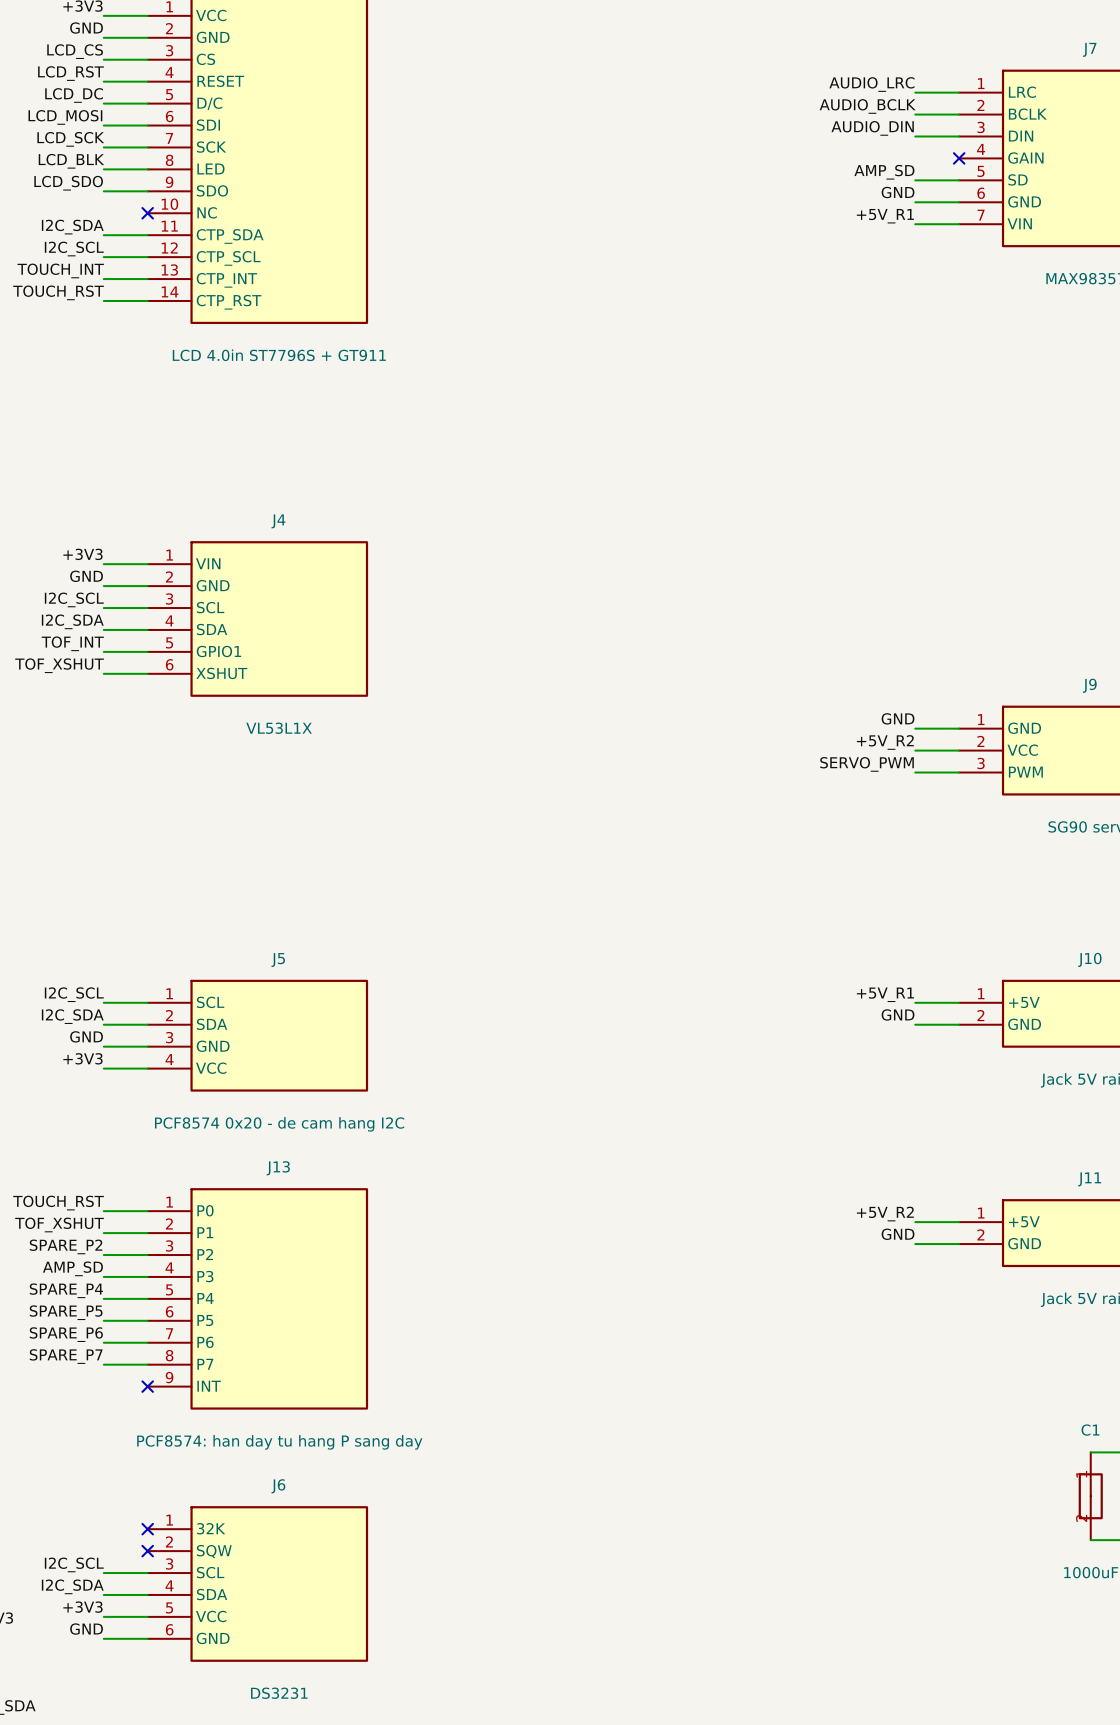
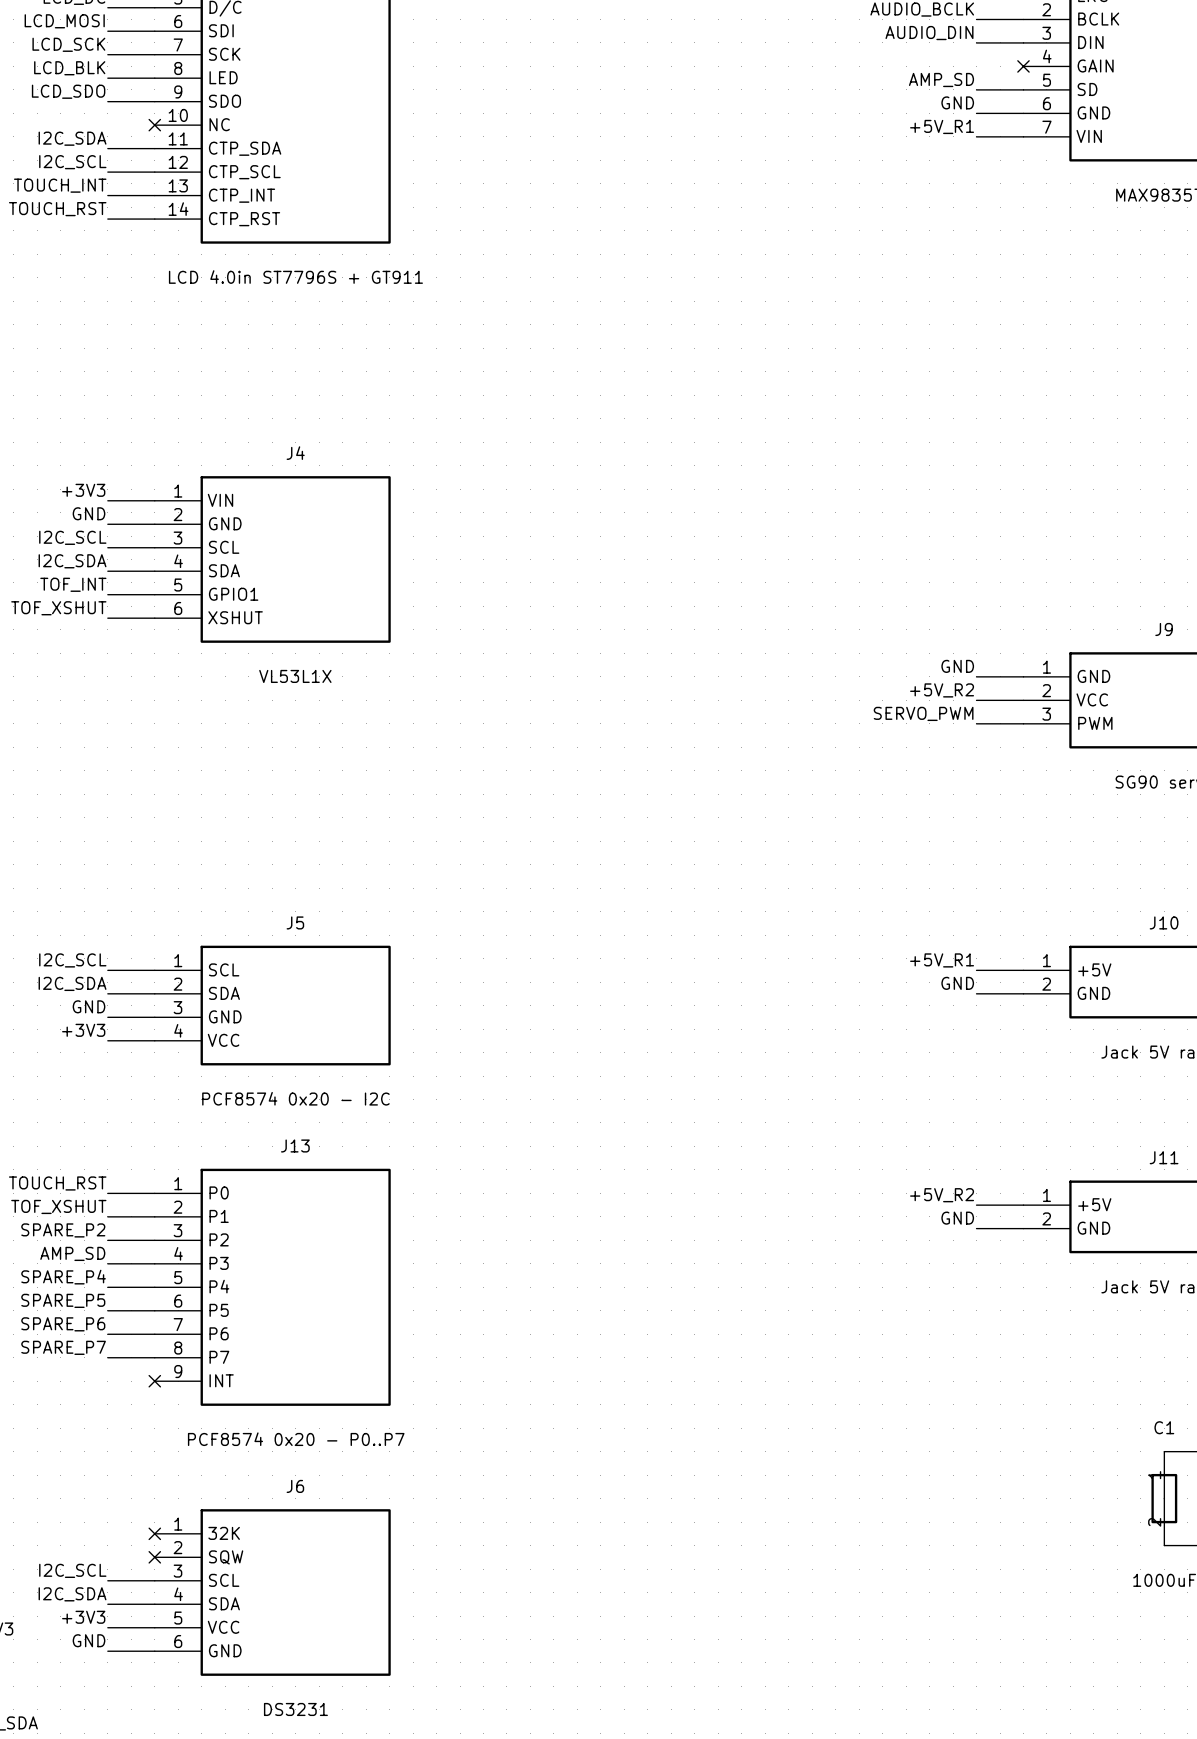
J5 value: PCF8574 0x20 - de cam hang I2C (279, 1124) -> PCF8574 0x20 - I2C (295, 1098)
J13 value: PCF8574: han day tu hang P sang day (279, 1442) -> PCF8574 0x20 - P0..P7 (296, 1439)

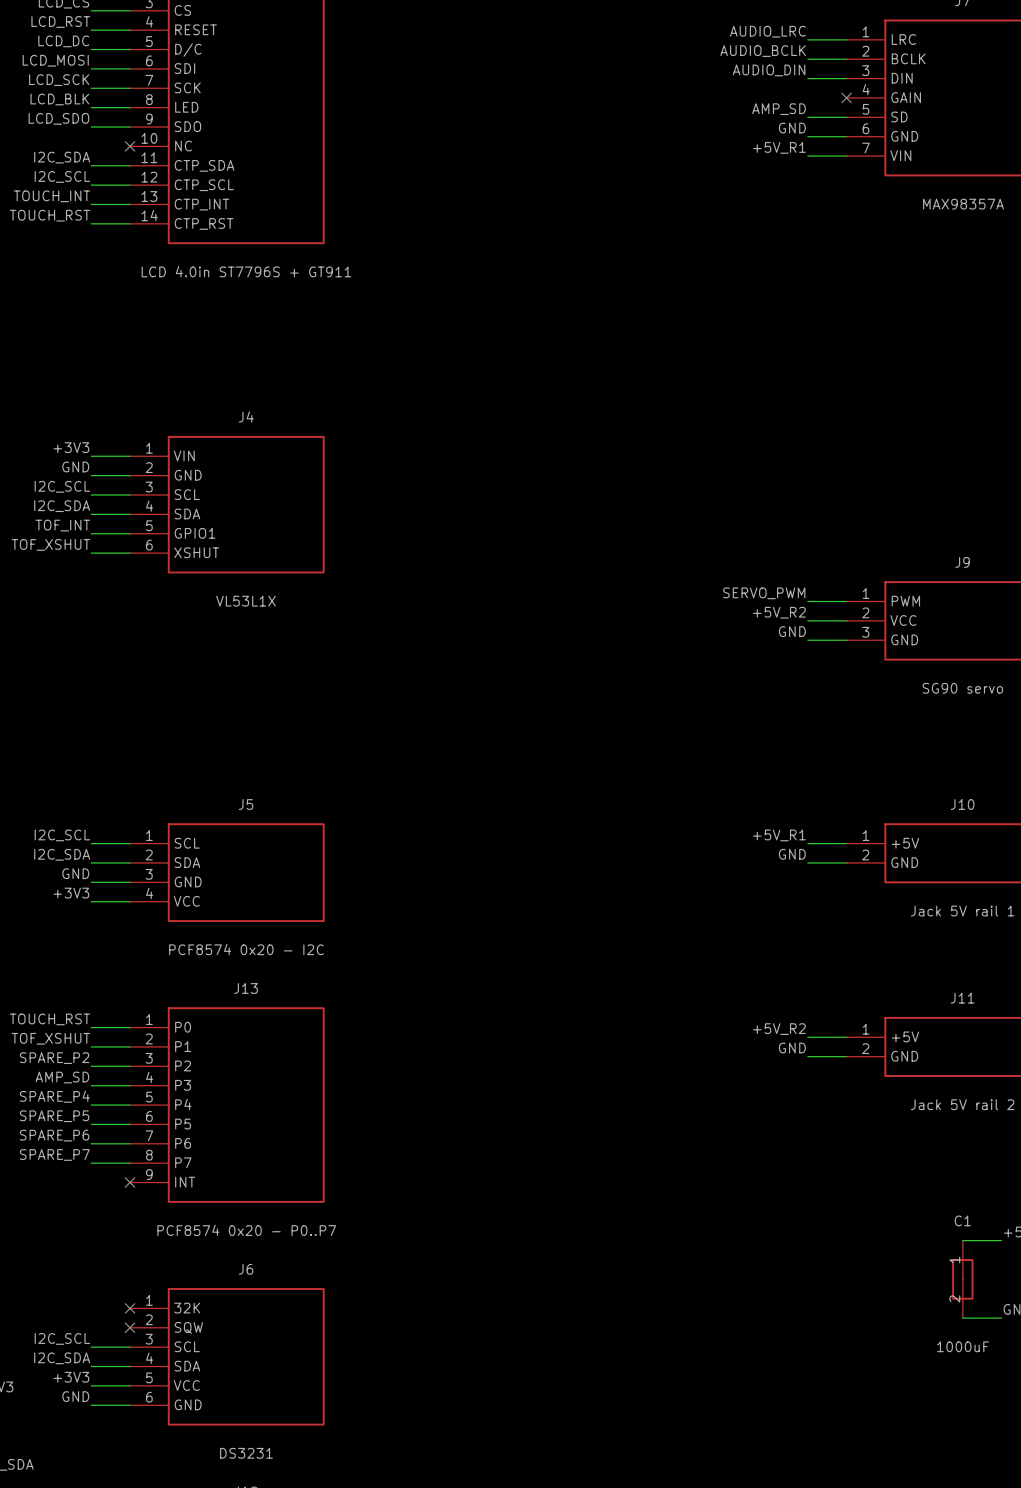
label: GND (957, 666) -> SERVO_PWM (764, 593)
J9 pin name: GND (1093, 676) -> PWM (905, 601)
label: SERVO_PWM (923, 713) -> GND (792, 631)
J9 pin name: PWM (1095, 723) -> GND (904, 639)

